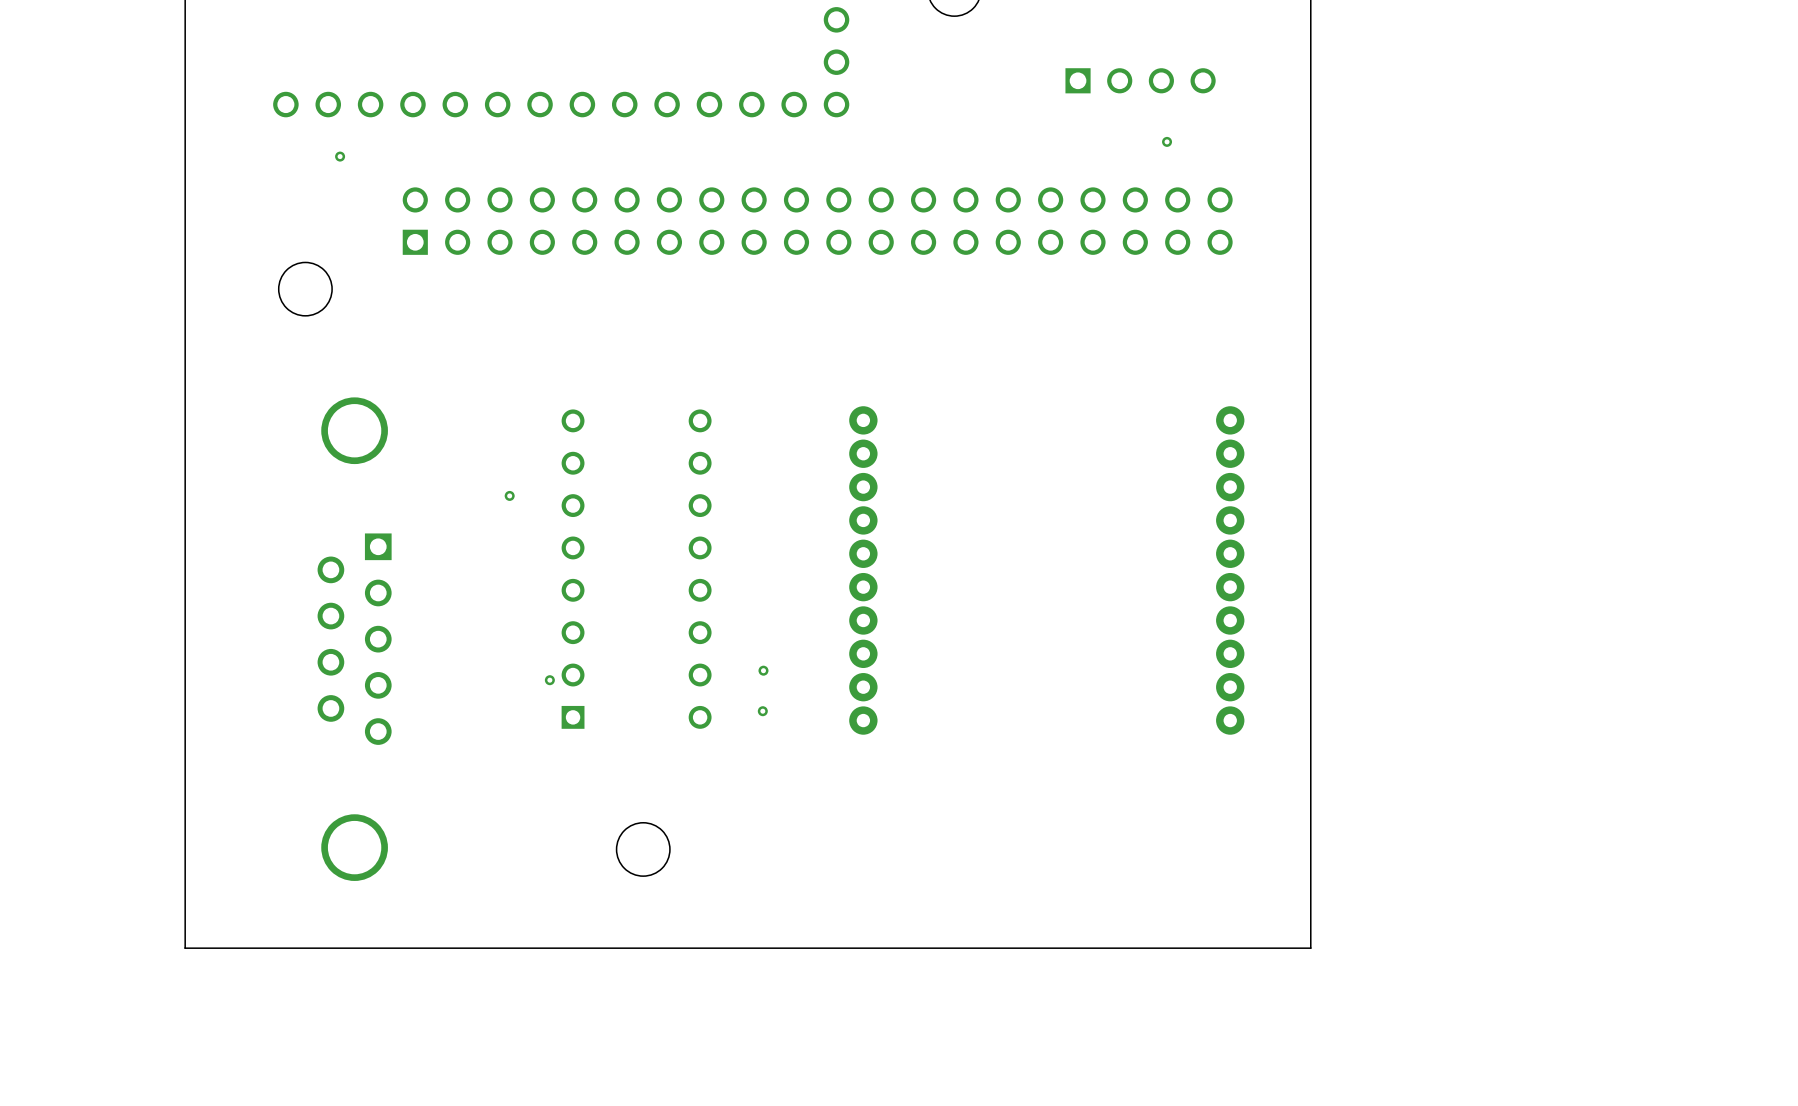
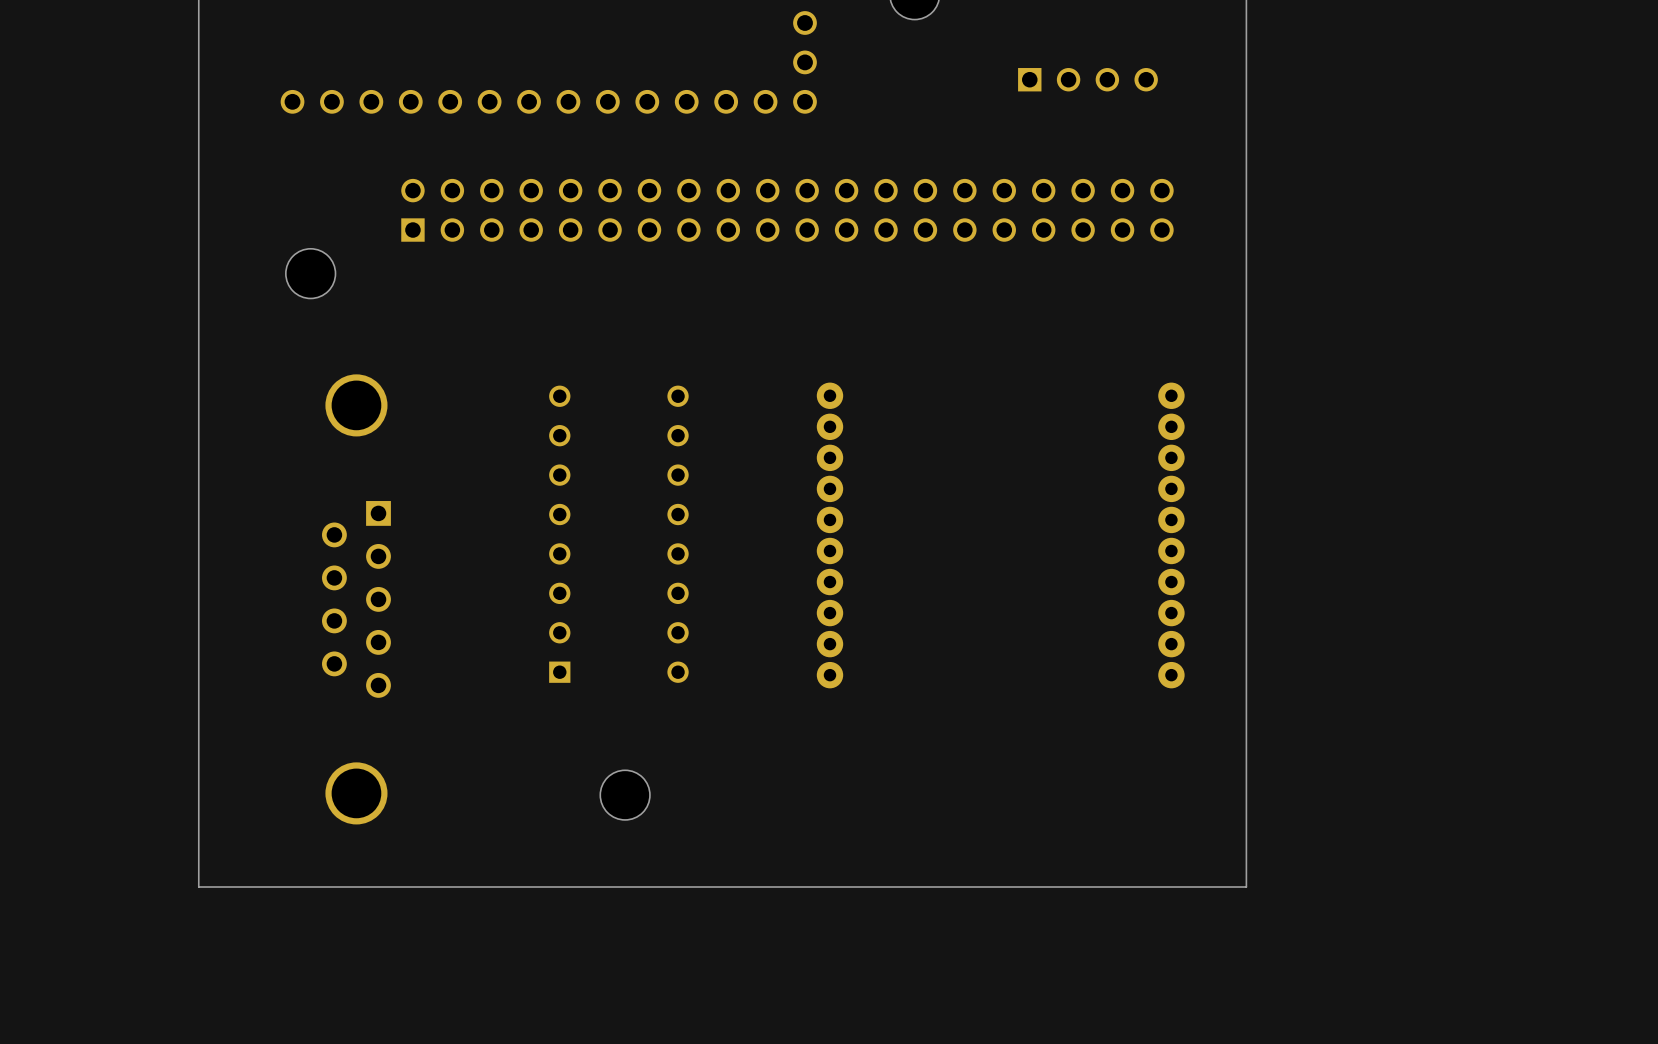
via: (1167, 141) -> none
via: (340, 156) -> none
via: (509, 495) -> none
via: (763, 670) -> none
via: (549, 680) -> none
via: (762, 711) -> none

